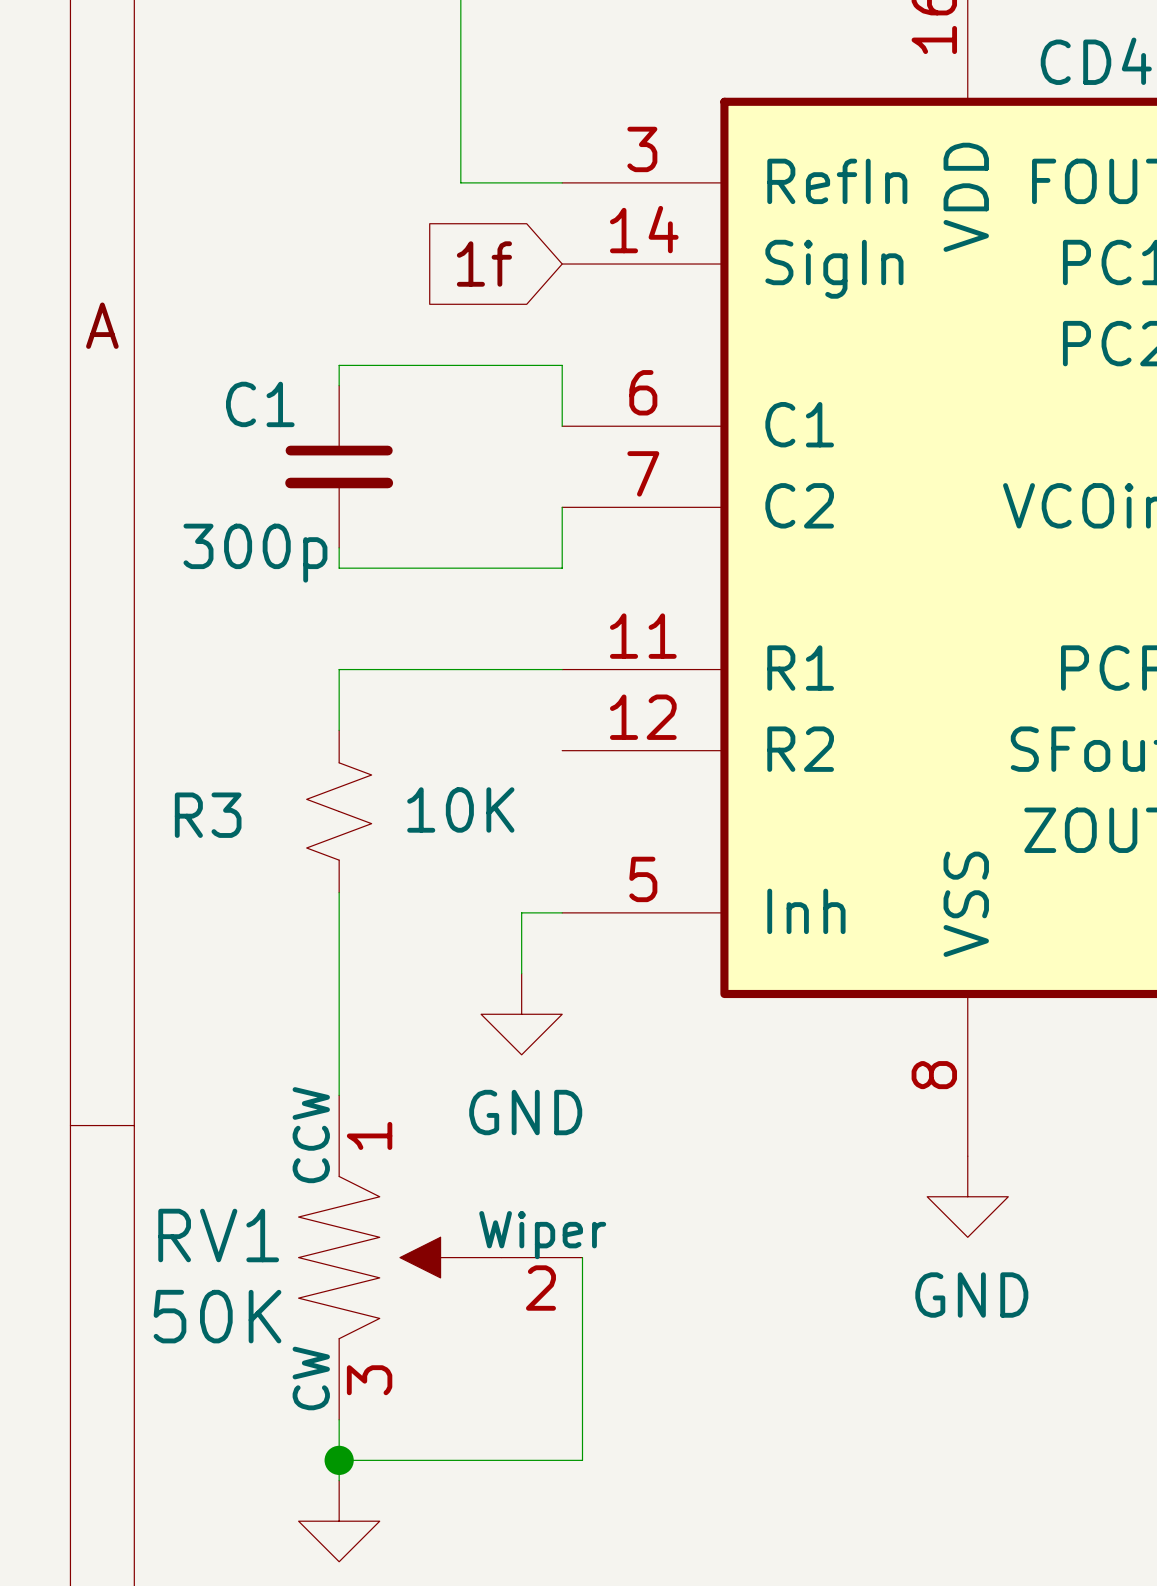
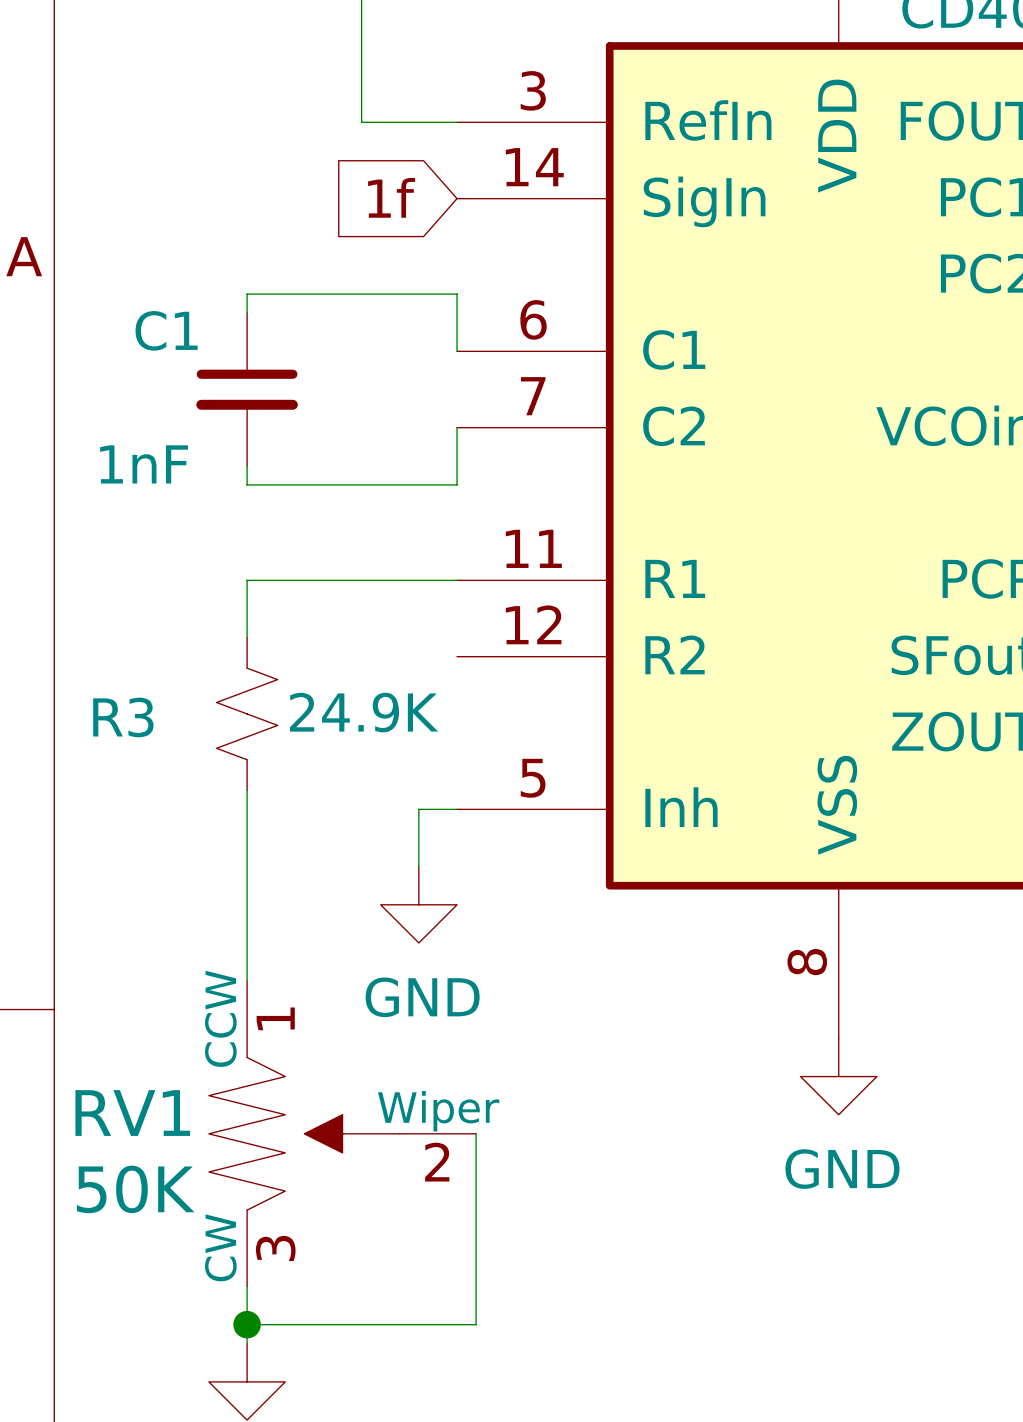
C1 value: 300p (255, 553) -> 1nF (144, 464)
R3 value: 10K (460, 809) -> 24.9K (364, 712)

